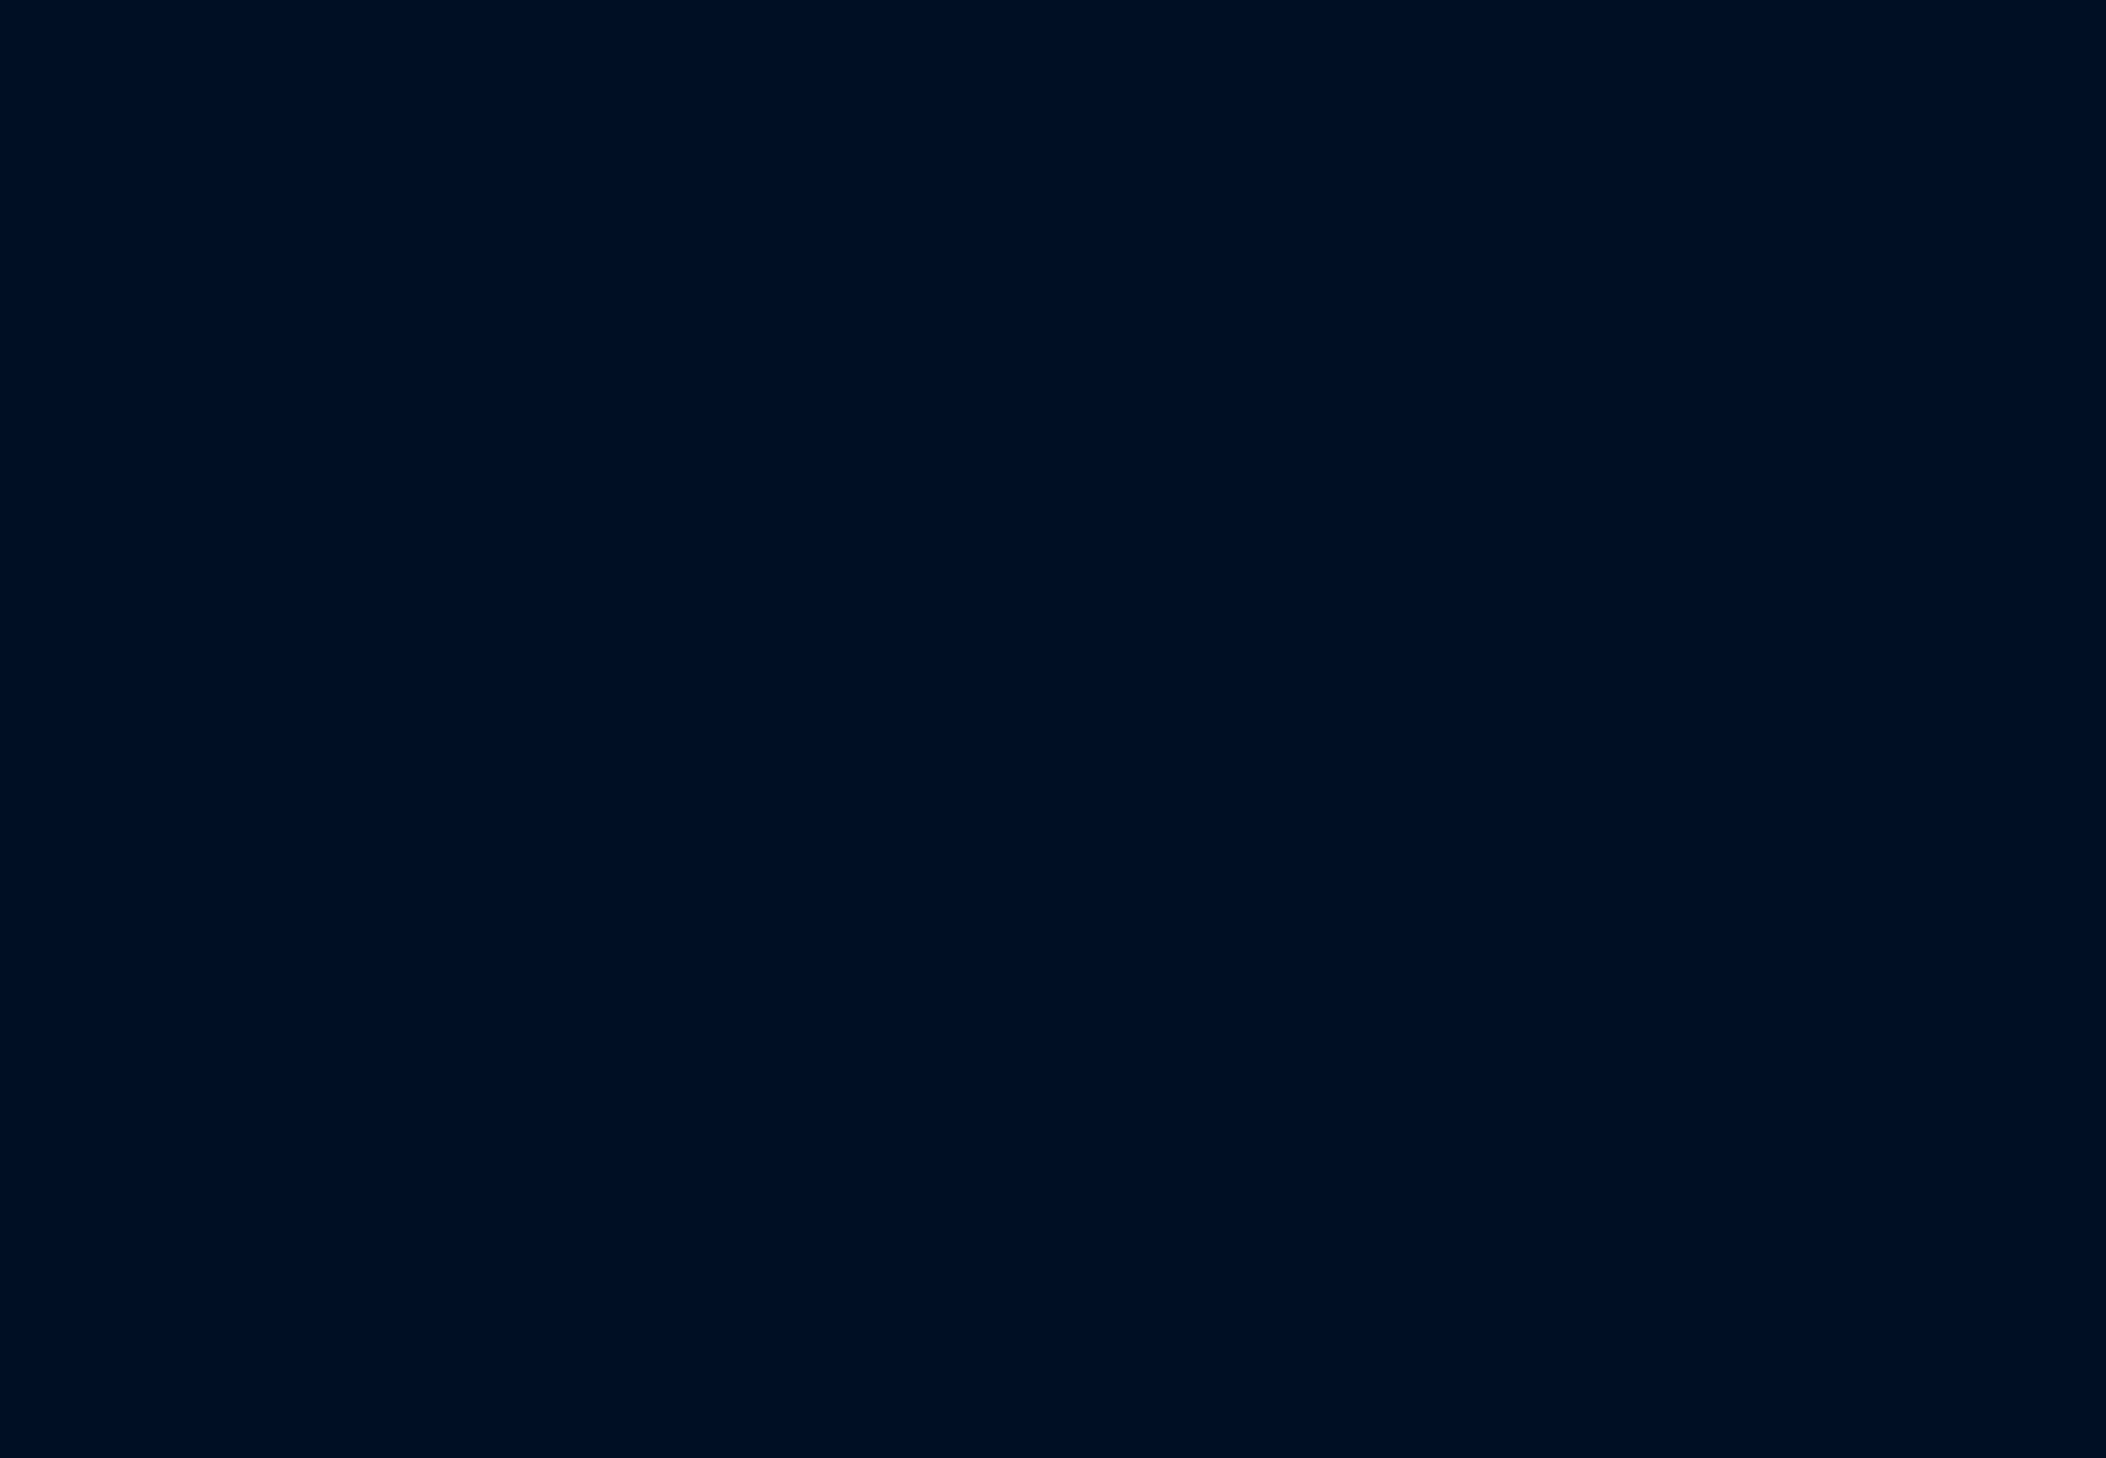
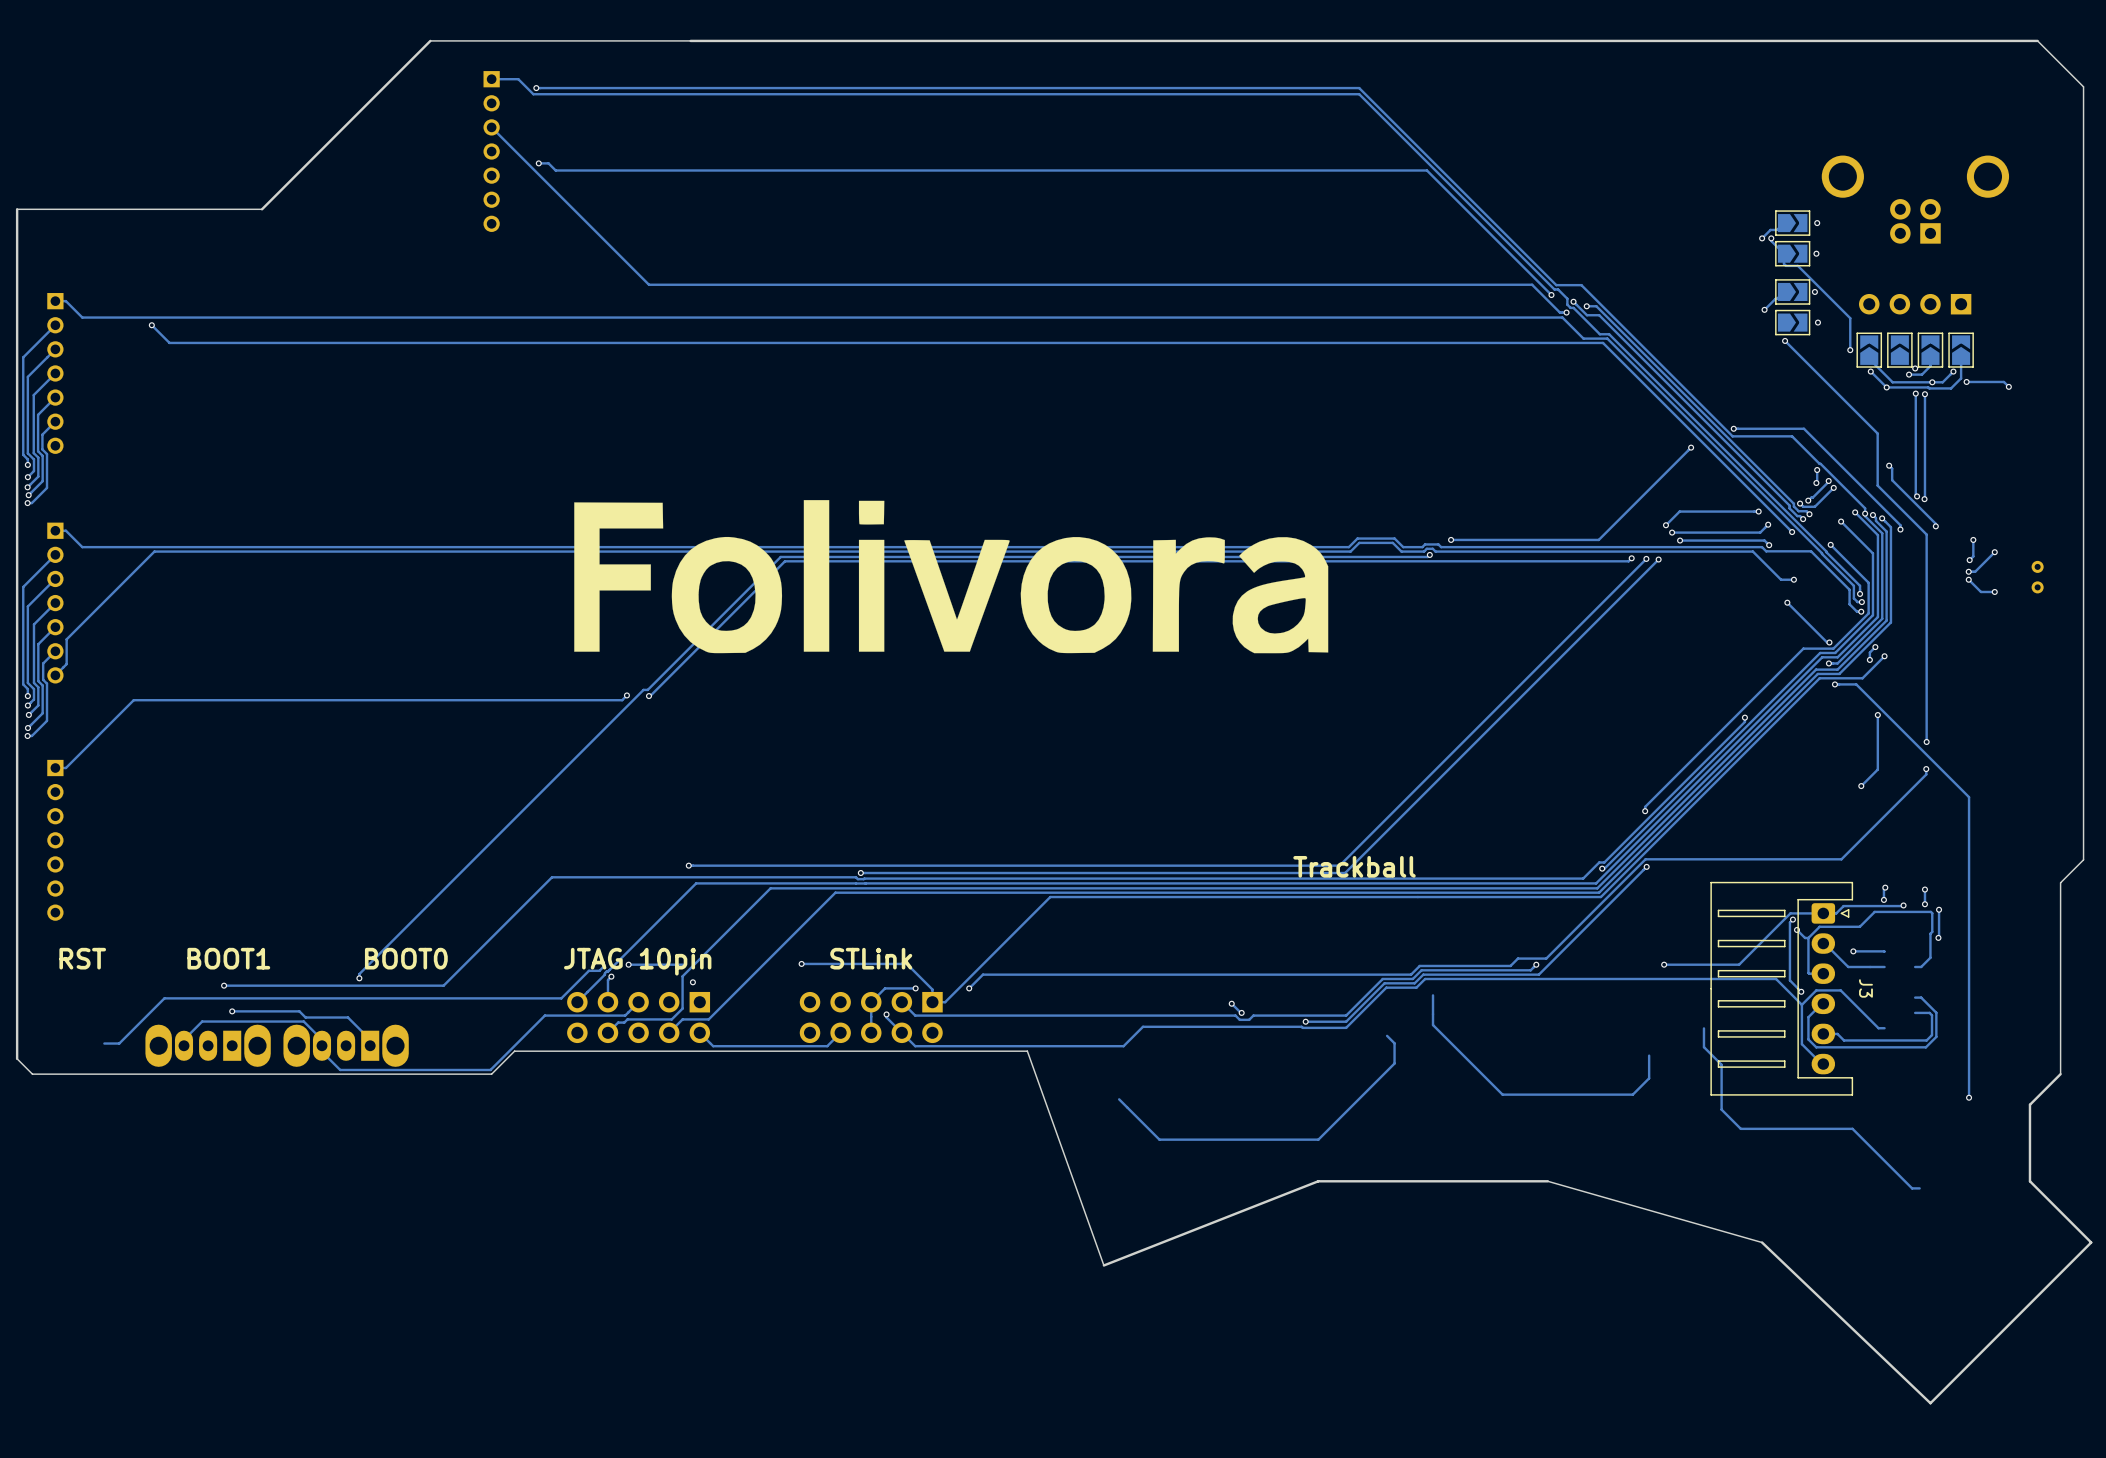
board edge: none -> (2037, 40) (2083, 86) (2083, 859) (2060, 882) (2060, 1074) (2029, 1104) (2029, 1181) (2091, 1242) (1930, 1403) (1762, 1242) (1547, 1181) (1318, 1181) (1103, 1265) (1027, 1051) (514, 1051) (491, 1074) (32, 1074) (17, 1058) (17, 209) (262, 209) (430, 40) (2037, 40)
track: none -> (491, 79) (518, 79) (533, 94) (1359, 94) (1554, 289) (1558, 289) (1567, 298) (1567, 304) (1570, 307) (1573, 307) (1599, 334) (1609, 334) (1860, 585) (1860, 593)
track: none -> (536, 88) (1359, 88) (1556, 285) (1581, 285) (1732, 436) (1792, 436) (1865, 508) (1865, 516) (1882, 533) (1882, 618) (1837, 663) (1828, 663)
via: none -> (536, 88)
track: none -> (491, 127) (648, 284) (1532, 284) (1559, 312) (1566, 312)
part: none -> (491, 151)
track: none -> (538, 163) (548, 163) (555, 170) (1426, 170) (1551, 295)
via: none -> (538, 163)
part: none -> (1915, 199)
track: none -> (1783, 223) (1777, 229) (1770, 229) (1762, 238)
part: none -> (1792, 223)
via: none -> (1817, 223)
via: none -> (1762, 238)
track: none -> (1771, 238) (1771, 241) (1783, 253) (1783, 263) (1785, 265) (1797, 265) (1850, 318) (1850, 350)
via: none -> (1771, 238)
part: none -> (1792, 253)
via: none -> (1816, 253)
track: none -> (1783, 291) (1764, 309)
part: none -> (1792, 291)
via: none -> (1814, 291)
via: none -> (1551, 295)
track: none -> (55, 301) (65, 301) (82, 317) (1562, 317) (1583, 338) (1607, 338) (1853, 585) (1853, 598) (1857, 602) (1861, 602)
track: none -> (1573, 301) (1586, 315) (1599, 315) (1789, 505) (1789, 508) (1803, 519)
via: none -> (1573, 301)
part: none -> (1915, 304)
track: none -> (1586, 306) (1596, 306) (1793, 503) (1798, 511) (1806, 511) (1809, 514)
via: none -> (1586, 306)
via: none -> (1764, 309)
via: none -> (1566, 312)
part: none -> (1792, 322)
via: none -> (1817, 322)
track: none -> (55, 325) (23, 357) (23, 454) (27, 459) (27, 464)
track: none -> (151, 325) (169, 342) (1603, 342) (1792, 532)
via: none -> (151, 325)
track: none -> (1785, 340) (1877, 433) (1877, 485) (1926, 534) (1926, 741)
via: none -> (1785, 340)
track: none -> (55, 349) (27, 376) (27, 453) (33, 459) (33, 471) (27, 477)
via: none -> (1850, 350)
part: none -> (1869, 350)
part: none -> (1899, 350)
part: none -> (1930, 350)
part: none -> (1961, 350)
track: none -> (1869, 358) (1892, 382) (1942, 382) (1953, 371)
track: none -> (1930, 358) (1930, 366) (1921, 374) (1909, 374)
track: none -> (1961, 358) (1961, 378) (1951, 388) (1886, 387) (1870, 371)
via: none -> (1915, 368)
via: none -> (1870, 371)
via: none -> (1953, 371)
track: none -> (55, 373) (33, 395) (33, 453) (38, 457) (38, 476) (27, 487)
part: none -> (55, 373)
via: none -> (1909, 374)
track: none -> (1966, 381) (2003, 381) (2008, 386)
via: none -> (1966, 381)
via: none -> (1932, 382)
via: none -> (2008, 386)
via: none -> (1886, 387)
track: none -> (1915, 393) (1917, 496)
via: none -> (1915, 393)
track: none -> (1924, 394) (1924, 499)
via: none -> (1924, 394)
track: none -> (55, 397) (38, 414) (38, 451) (42, 455) (42, 481) (28, 495)
track: none -> (55, 421) (42, 434) (42, 449) (47, 454) (47, 487) (31, 503) (27, 503)
track: none -> (1733, 428) (1803, 428) (1900, 525) (1900, 529)
via: none -> (1733, 428)
track: none -> (1691, 447) (1598, 539) (1451, 539)
via: none -> (1691, 447)
via: none -> (27, 464)
track: none -> (1889, 465) (1892, 468) (1892, 480) (1935, 523) (1935, 526)
via: none -> (1889, 465)
track: none -> (1817, 470) (1816, 483)
via: none -> (1817, 470)
via: none -> (27, 477)
track: none -> (1828, 481) (1808, 500)
via: none -> (1828, 481)
via: none -> (1816, 483)
via: none -> (27, 487)
track: none -> (1833, 487) (1814, 506) (1803, 506) (1800, 503)
via: none -> (1833, 487)
via: none -> (28, 495)
via: none -> (1917, 496)
via: none -> (1924, 499)
drawing: none -> [574, 500, 1329, 654]
via: none -> (1808, 500)
via: none -> (27, 503)
via: none -> (1800, 503)
track: none -> (1758, 511) (1679, 511) (1665, 525)
via: none -> (1758, 511)
track: none -> (1855, 512) (1877, 535) (1877, 617) (1837, 657) (1822, 657) (1596, 883) (865, 883)
via: none -> (1855, 512)
via: none -> (1865, 513)
via: none -> (1809, 514)
track: none -> (1872, 515) (1886, 531) (1886, 620) (1837, 669) (1816, 669) (1597, 888) (770, 888) (682, 976) (682, 1008) (671, 1019) (627, 1019) (624, 1022) (618, 1022) (607, 1032)
via: none -> (1872, 515)
track: none -> (1882, 518) (1890, 527) (1890, 622) (1839, 673) (1817, 673) (1599, 892) (835, 892) (708, 1019) (682, 1019) (669, 1032)
via: none -> (1882, 518)
via: none -> (1803, 519)
track: none -> (1841, 521) (1872, 553) (1872, 615) (1835, 652) (1820, 652) (1604, 868) (1602, 868)
via: none -> (1841, 521)
track: none -> (1768, 524) (1760, 532) (1672, 532)
via: none -> (1768, 524)
via: none -> (1665, 525)
via: none -> (1935, 526)
via: none -> (1900, 529)
track: none -> (55, 530) (65, 530) (82, 547) (1348, 547) (1357, 538) (1394, 538) (1403, 547) (1422, 547) (1425, 544) (1438, 544) (1441, 547) (1762, 547) (1766, 551) (1811, 551) (1849, 589) (1849, 604) (1857, 611) (1861, 611)
via: none -> (1672, 532)
via: none -> (1792, 532)
via: none -> (1451, 539)
track: none -> (1973, 539) (1973, 556) (1969, 560)
via: none -> (1973, 539)
track: none -> (1680, 540) (1764, 540) (1769, 545)
via: none -> (1680, 540)
track: none -> (1830, 544) (1868, 582) (1868, 613) (1833, 648) (1803, 648) (1645, 806) (1645, 811)
via: none -> (1830, 544)
via: none -> (1769, 545)
track: none -> (1994, 552) (1975, 571) (1968, 571)
via: none -> (1994, 552)
track: none -> (55, 554) (23, 587) (23, 684) (27, 689) (27, 696)
track: none -> (1429, 554) (1427, 556) (780, 556) (647, 689) (643, 689) (359, 974) (359, 978)
via: none -> (1429, 554)
track: none -> (1631, 558) (1628, 561) (784, 561) (648, 696)
via: none -> (1631, 558)
track: none -> (1646, 558) (1339, 865) (688, 865)
via: none -> (1646, 558)
track: none -> (1658, 559) (1345, 873) (860, 873)
via: none -> (1658, 559)
via: none -> (1969, 560)
via: none -> (1968, 571)
part: none -> (2037, 577)
track: none -> (55, 578) (27, 606) (27, 682) (33, 689) (33, 699) (27, 705)
track: none -> (1793, 579) (1781, 579) (1752, 551) (1435, 551) (1432, 548) (1426, 548) (1424, 551) (1401, 551) (1392, 542) (1359, 542) (1350, 551) (154, 551) (66, 639) (66, 664) (55, 675)
via: none -> (1793, 579)
track: none -> (1968, 579) (1980, 591) (1994, 591)
via: none -> (1968, 579)
via: none -> (1994, 591)
via: none -> (1860, 593)
track: none -> (1787, 602) (1827, 642) (1829, 642)
via: none -> (1787, 602)
via: none -> (1861, 602)
track: none -> (55, 603) (33, 624) (33, 682) (38, 687) (38, 705) (28, 714)
part: none -> (55, 603)
via: none -> (1861, 611)
track: none -> (55, 627) (38, 644) (38, 681) (42, 685) (42, 713) (27, 728)
via: none -> (1829, 642)
track: none -> (1875, 647) (1869, 652) (1869, 659)
via: none -> (1875, 647)
track: none -> (55, 651) (43, 663) (43, 679) (47, 683) (47, 720) (31, 735) (27, 735)
track: none -> (1884, 656) (1862, 678) (1819, 678) (1600, 897) (1050, 897) (945, 1002) (932, 1002) (932, 989) (906, 963) (801, 963)
via: none -> (1884, 656)
via: none -> (1869, 659)
via: none -> (1828, 663)
track: none -> (1834, 684) (1856, 684) (1969, 797) (1969, 1097)
via: none -> (1834, 684)
track: none -> (626, 695) (622, 700) (133, 700) (65, 768) (55, 768)
via: none -> (626, 695)
via: none -> (27, 696)
via: none -> (648, 696)
via: none -> (27, 705)
via: none -> (28, 714)
track: none -> (1877, 715) (1877, 769) (1861, 786)
via: none -> (1877, 715)
track: none -> (1744, 717) (1744, 721) (1604, 862) (1599, 862) (1583, 878) (552, 877) (443, 985) (224, 985)
via: none -> (1744, 717)
via: none -> (27, 728)
via: none -> (27, 735)
via: none -> (1926, 741)
track: none -> (1926, 769) (1926, 774) (1841, 859) (1645, 859) (1546, 958) (1517, 958) (1510, 965) (1419, 965) (1411, 974) (982, 974) (969, 988)
via: none -> (1926, 769)
via: none -> (1861, 786)
via: none -> (1645, 811)
part: none -> (55, 840)
via: none -> (688, 865)
text: none -> Trackball (1354, 866)
track: none -> (1646, 866) (1538, 974) (1423, 974) (1414, 983) (1384, 983) (1346, 1021) (1305, 1021)
via: none -> (1646, 866)
via: none -> (1602, 868)
via: none -> (860, 873)
track: none -> (856, 883) (696, 883) (577, 1002)
track: none -> (865, 883) (856, 883)
track: none -> (1885, 887) (1883, 899)
via: none -> (1885, 887)
track: none -> (1924, 889) (1924, 904)
via: none -> (1924, 889)
via: none -> (1883, 899)
via: none -> (1924, 904)
track: none -> (1903, 905) (1843, 906) (1836, 913) (1790, 913) (1739, 964) (1664, 964)
via: none -> (1903, 905)
track: none -> (1939, 909) (1938, 937)
via: none -> (1939, 909)
track: none -> (1792, 919) (1789, 922) (1789, 980) (1801, 991)
via: none -> (1792, 919)
track: none -> (1797, 929) (1805, 938) (1808, 938)
via: none -> (1797, 929)
via: none -> (1938, 937)
track: none -> (1808, 938) (1808, 972) (1823, 973)
track: none -> (1808, 938) (1819, 926) (1859, 926) (1874, 911) (1930, 911) (1932, 931) (1930, 933) (1930, 957) (1921, 966) (1915, 966)
track: none -> (1823, 943) (1848, 966) (1884, 966)
track: none -> (1853, 951) (1884, 951)
via: none -> (1853, 951)
text: none -> RST (82, 958)
text: none -> BOOT1 (228, 958)
text: none -> BOOT0 (406, 958)
text: none -> STLink (871, 958)
text: none -> JTAG 10pin (637, 961)
via: none -> (801, 963)
via: none -> (628, 964)
track: none -> (685, 964) (628, 964)
track: none -> (1536, 964) (1530, 970) (1421, 970) (1412, 978) (1382, 978) (1346, 1015) (1253, 1015) (1249, 1019) (1239, 1019) (1235, 1015) (915, 1015) (901, 1002)
via: none -> (1536, 964)
via: none -> (1664, 964)
track: none -> (604, 965) (599, 970) (588, 970) (561, 998) (164, 998) (119, 1043) (104, 1043)
track: none -> (611, 976) (607, 980) (607, 1002)
via: none -> (611, 976)
via: none -> (359, 978)
via: none -> (692, 982)
via: none -> (224, 985)
track: none -> (915, 988) (885, 988) (871, 1002) (871, 1032)
via: none -> (915, 988)
via: none -> (969, 988)
J3: none -> (1781, 988)
via: none -> (1801, 991)
track: none -> (1433, 995) (1433, 1025) (1502, 1094) (1632, 1094) (1649, 1078) (1649, 1055)
track: none -> (1915, 997) (1921, 997) (1936, 1012) (1936, 1036) (1925, 1047) (1816, 1047) (1808, 1039) (1808, 1017) (1823, 1003)
track: none -> (638, 1002) (625, 1015) (544, 1015) (490, 1069) (340, 1069) (322, 1051) (322, 1039) (303, 1021) (202, 1021) (183, 1039) (183, 1045)
track: none -> (1231, 1003) (1241, 1012)
via: none -> (1231, 1003)
track: none -> (1801, 1004) (1816, 990) (1840, 990) (1878, 1028) (1884, 1028)
track: none -> (1801, 1004) (1801, 1044) (1823, 1064)
track: none -> (1801, 1004) (1776, 978) (1425, 978) (1416, 987) (1386, 987) (1346, 1027) (1142, 1026) (1123, 1046) (915, 1046) (886, 1017) (886, 1014)
track: none -> (232, 1011) (299, 1011) (305, 1017) (347, 1017) (370, 1039) (370, 1045)
via: none -> (232, 1011)
via: none -> (1241, 1012)
track: none -> (1915, 1012) (1929, 1012) (1932, 1015) (1932, 1035) (1926, 1040) (1844, 1040) (1837, 1033) (1823, 1033)
via: none -> (886, 1014)
part: none -> (638, 1017)
part: none -> (871, 1017)
via: none -> (1305, 1021)
track: none -> (1703, 1028) (1703, 1047) (1721, 1064) (1721, 1109) (1740, 1128) (1852, 1128) (1912, 1188) (1919, 1188)
track: none -> (840, 1032) (827, 1046) (713, 1046) (699, 1032)
track: none -> (1387, 1035) (1394, 1043) (1394, 1063) (1318, 1139) (1159, 1139) (1119, 1099)
part: none -> (208, 1045)
part: none -> (346, 1045)
via: none -> (1969, 1097)

